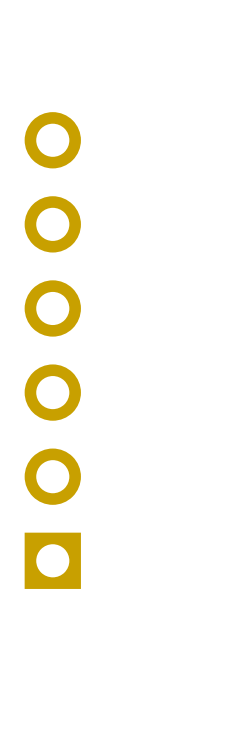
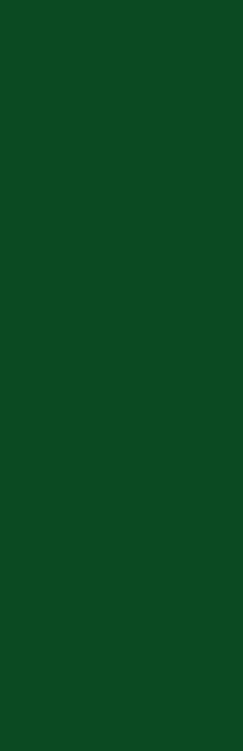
part: (52, 350) -> none

